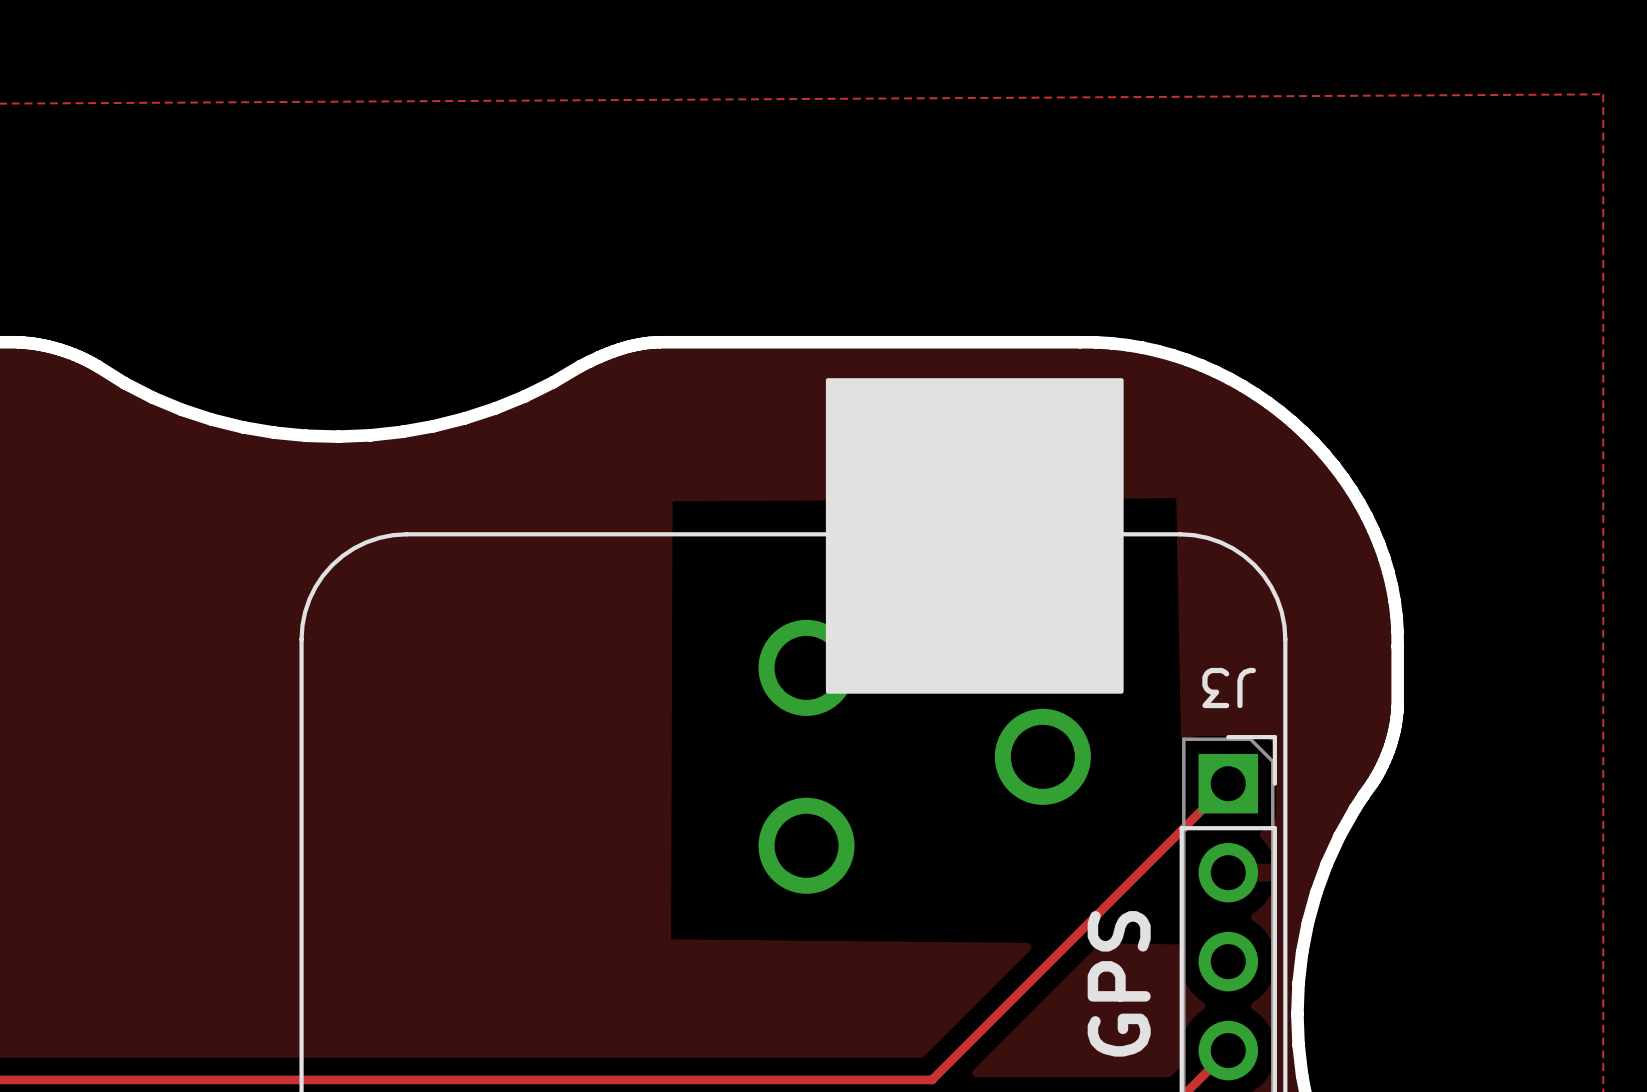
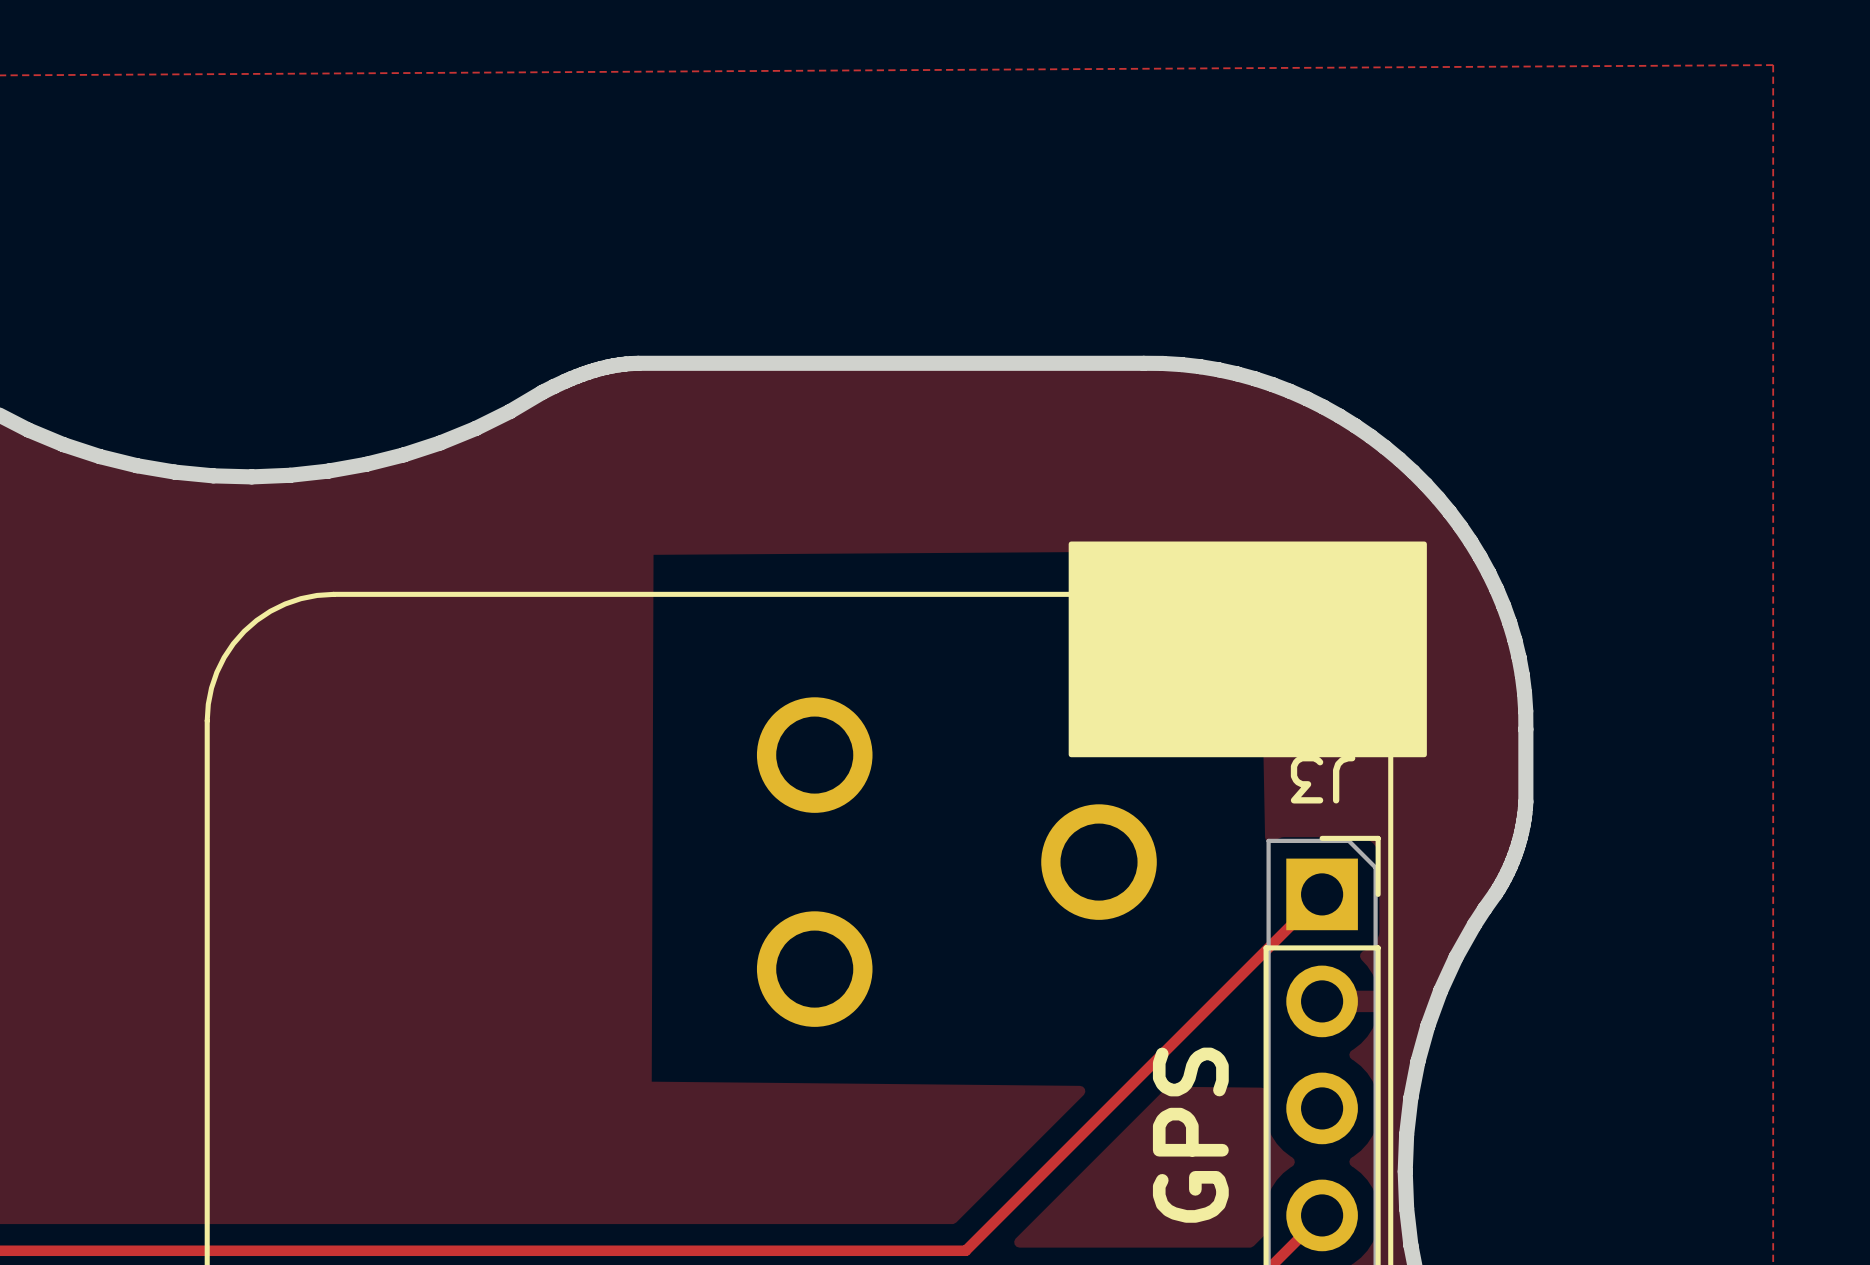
drawing: [825, 378, 1124, 694] -> none
drawing: none -> [1068, 541, 1427, 758]

